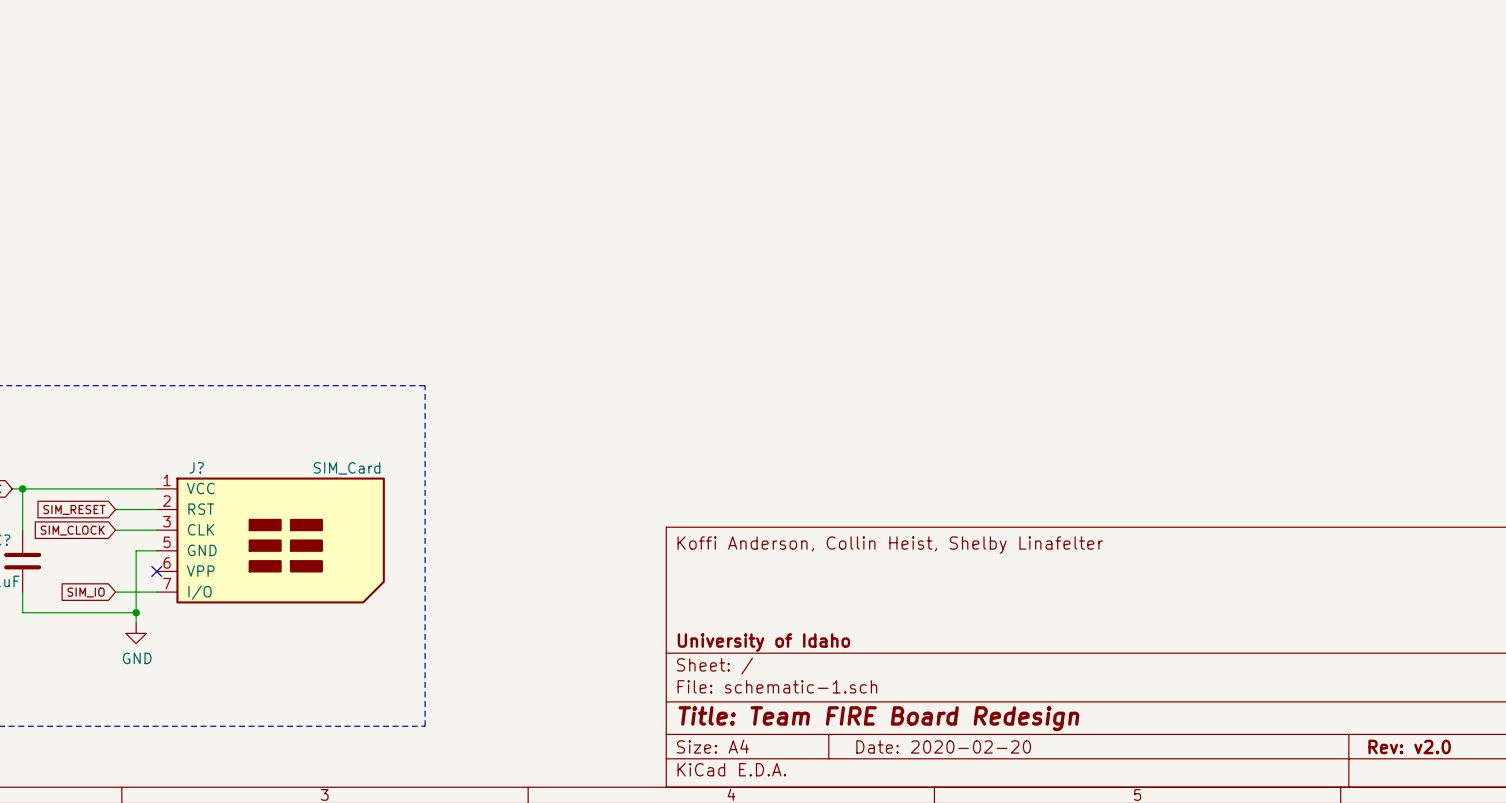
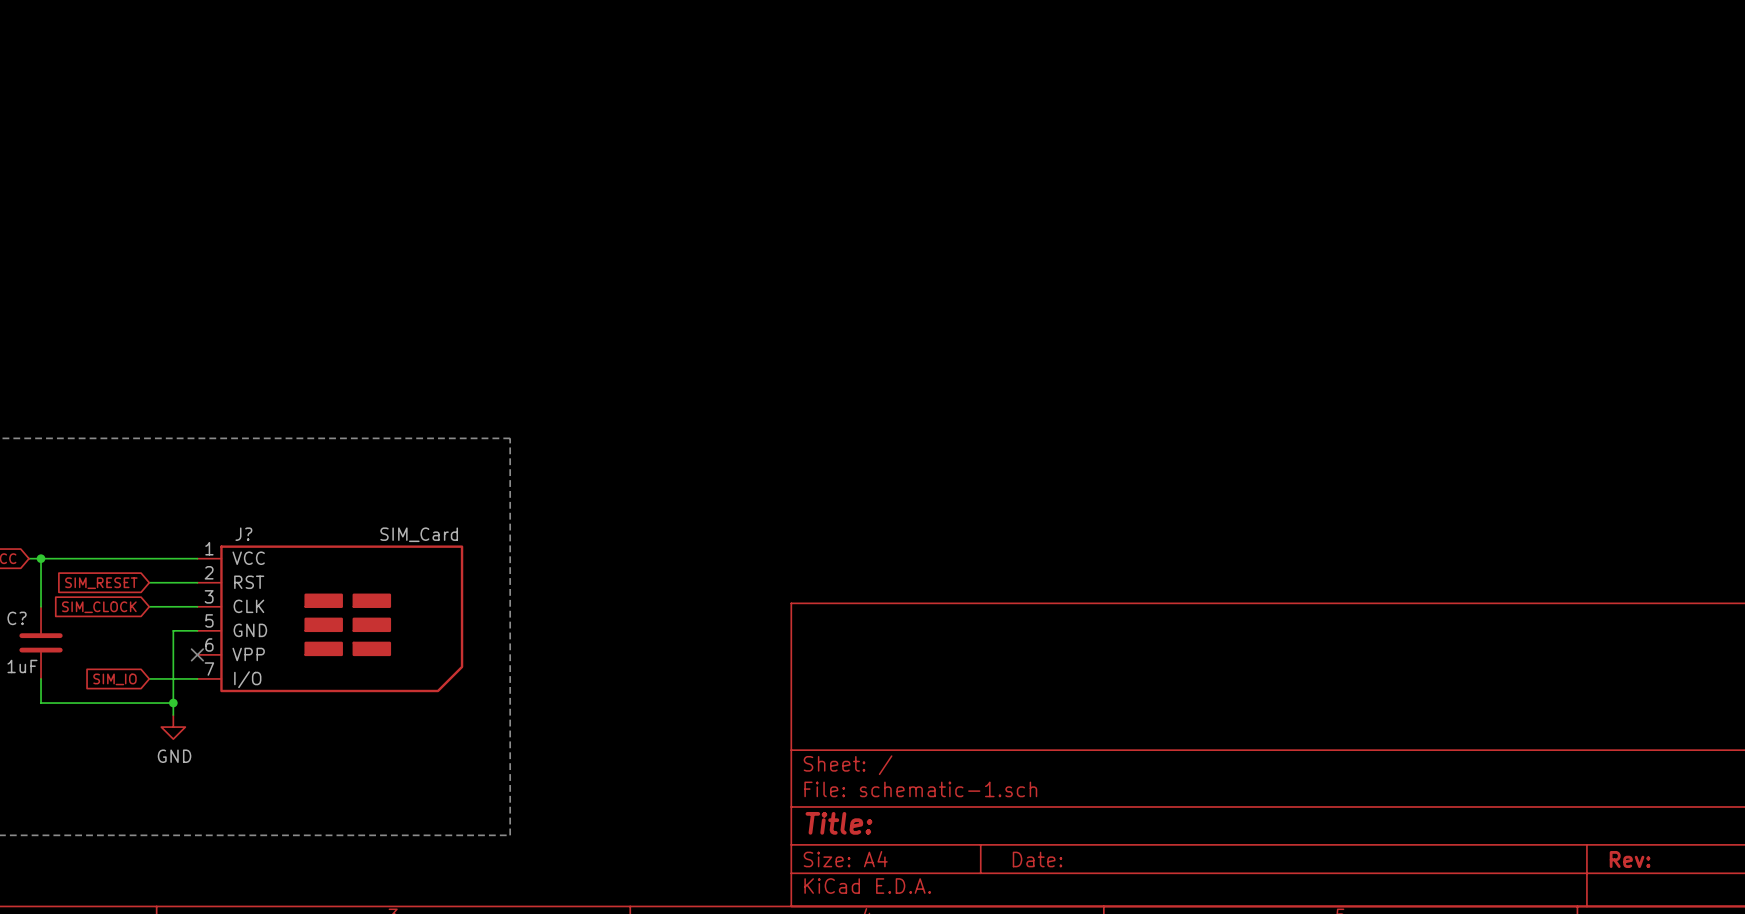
title block: Koffi Anderson, Collin Heist, Shelby Linafelter (890, 545) -> none
title block: University of Idaho (763, 642) -> none
title block: Title: Team FIRE Board Redesign (878, 718) -> Title: (838, 823)
title block: Date: 2020-02-20 (943, 746) -> Date: (1037, 859)
title block: Rev: v2.0 (1409, 746) -> Rev: (1630, 859)

